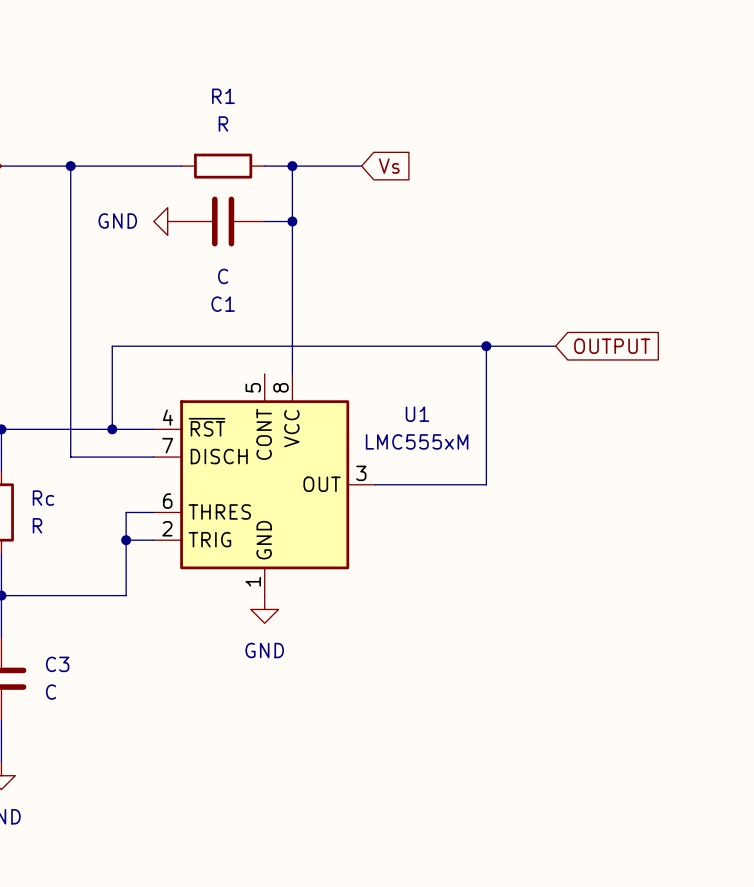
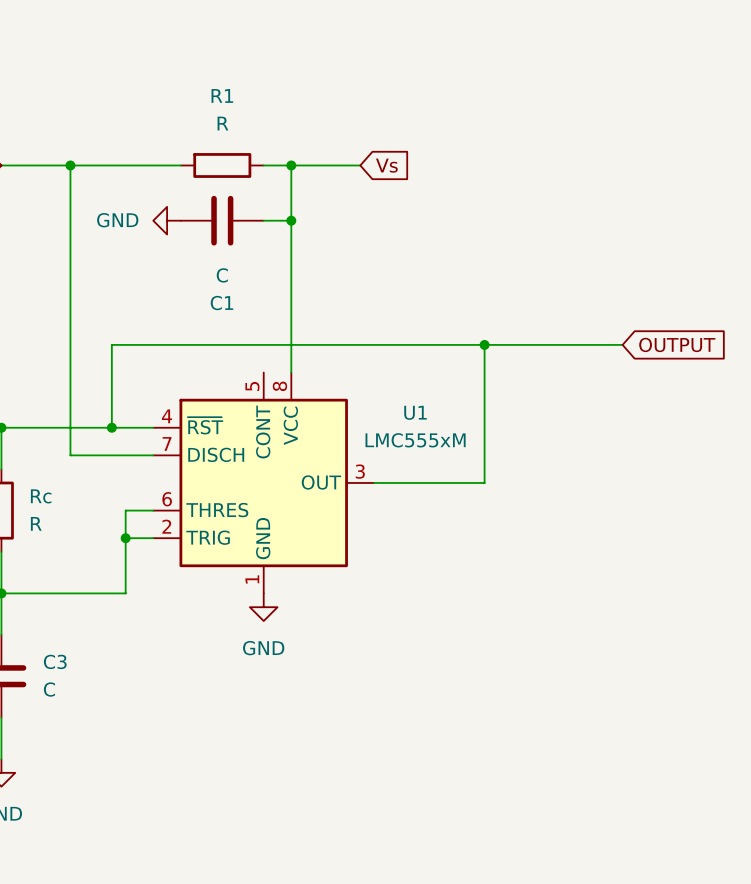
wire: none -> (553, 344) (622, 344)
global label position: OUTPUT (612, 346) -> OUTPUT (677, 344)

